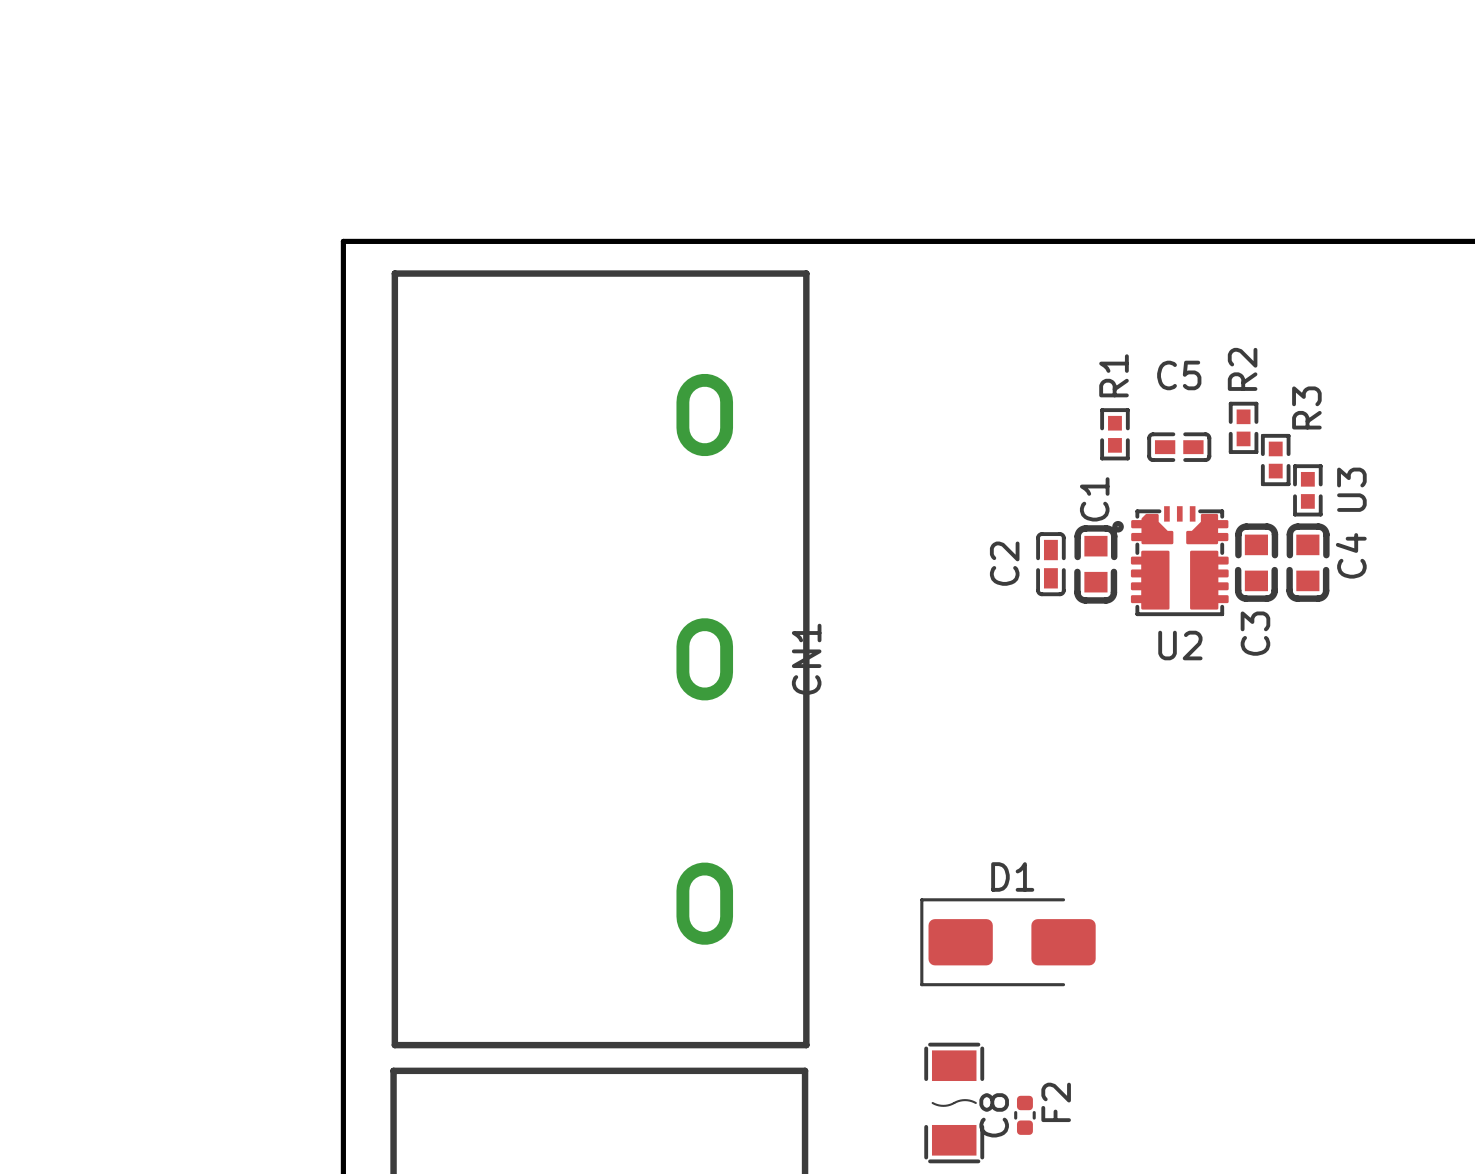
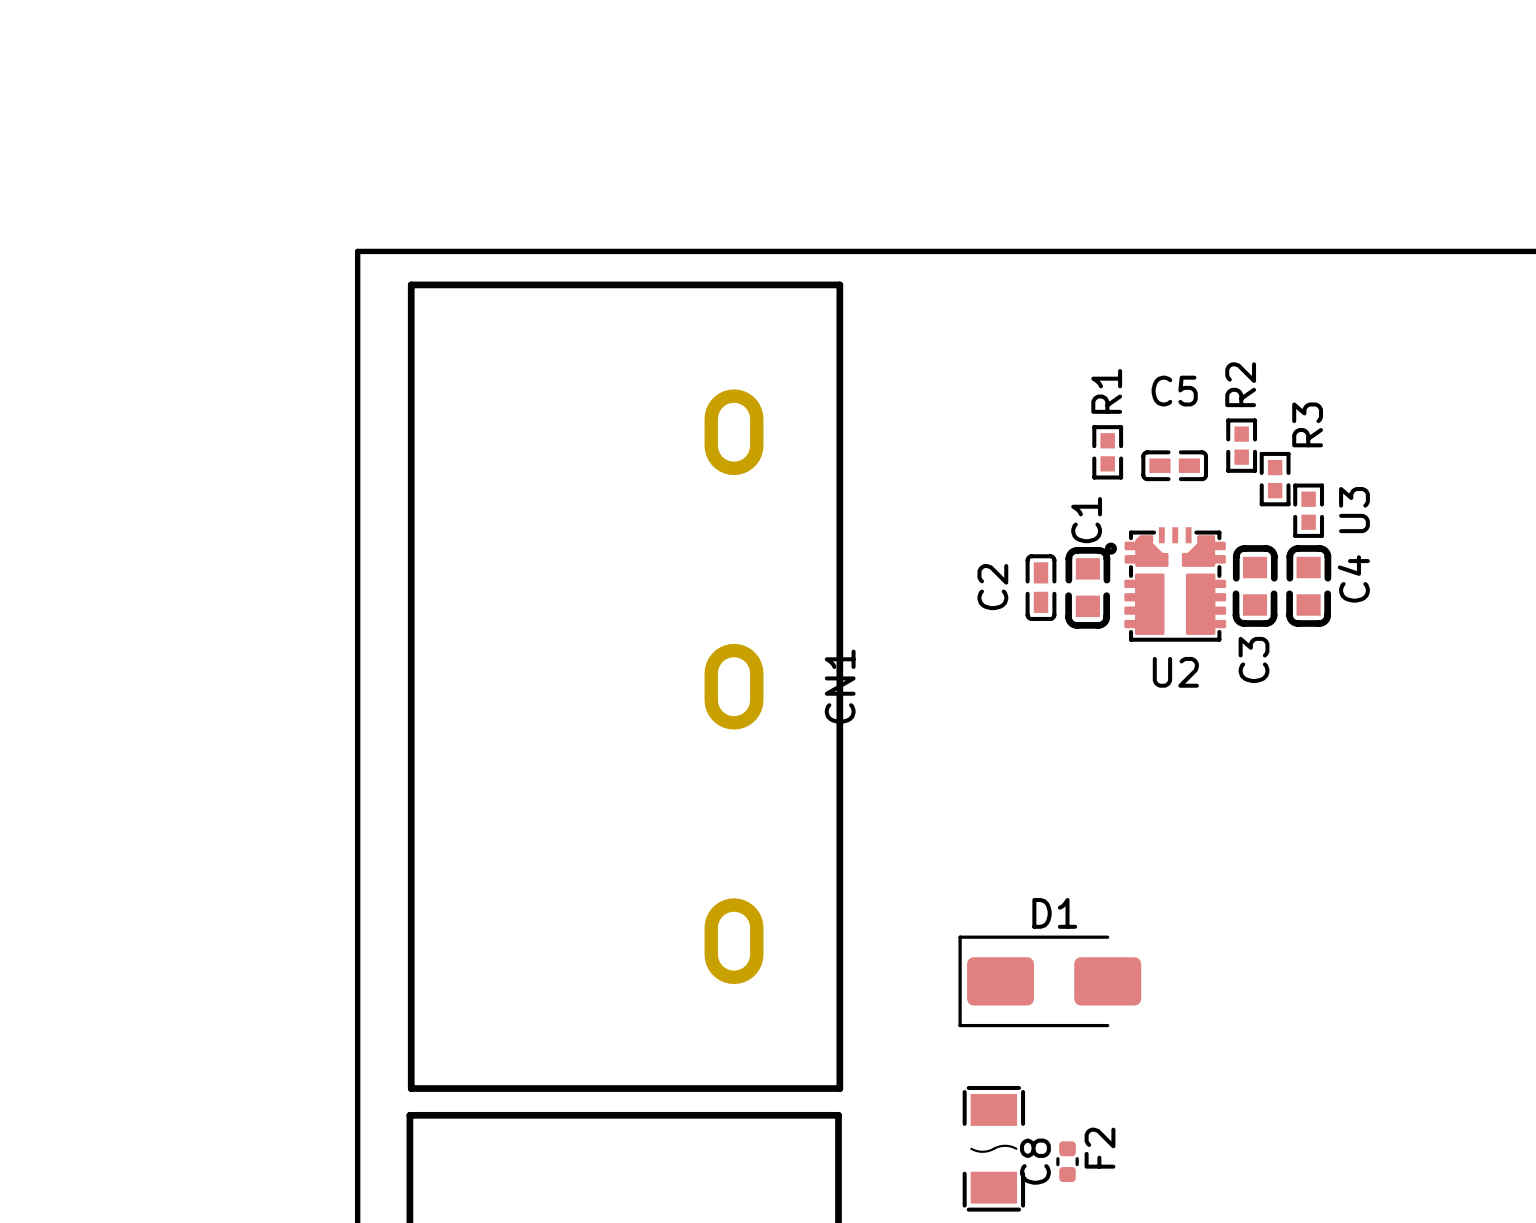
R2 position: (1243, 427) -> (1241, 445)
R1 position: (1114, 434) -> (1107, 452)
C5 position: (1179, 447) -> (1174, 465)
R3 position: (1275, 460) -> (1275, 479)
U3 position: (1307, 490) -> (1308, 510)
U2 position: (1170, 561) -> (1165, 584)
C3: none -> (1255, 586)
C4: (1307, 562) -> none
C2 position: (1050, 564) -> (1041, 587)
C1 position: (1095, 564) -> (1087, 587)
C3 name: C3 (1255, 633) -> C4 (1353, 578)

